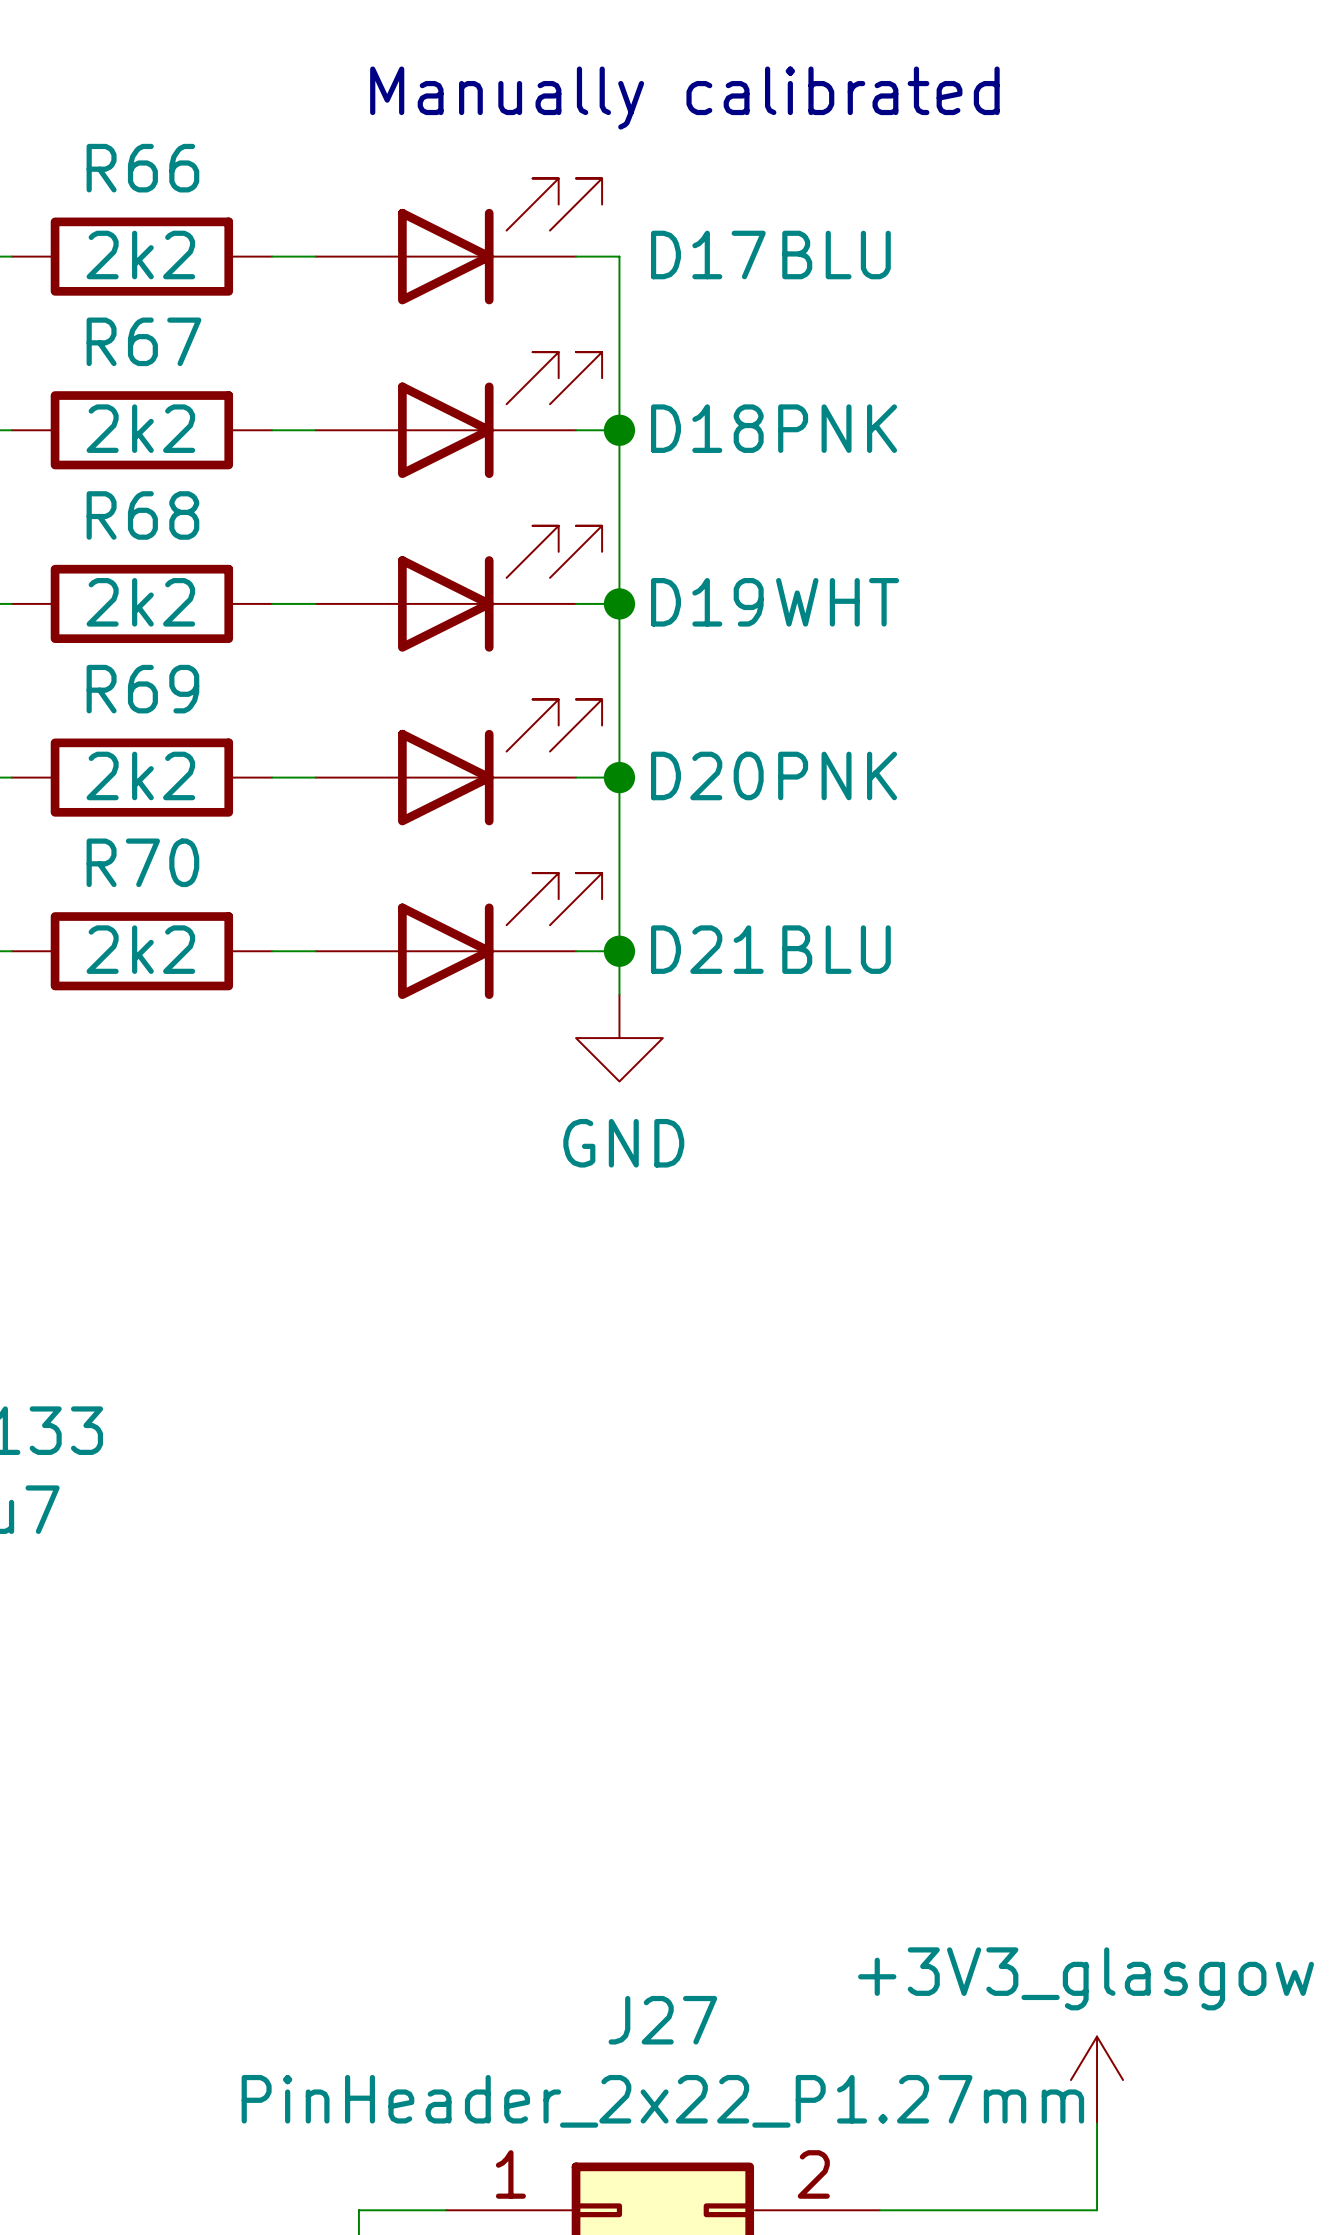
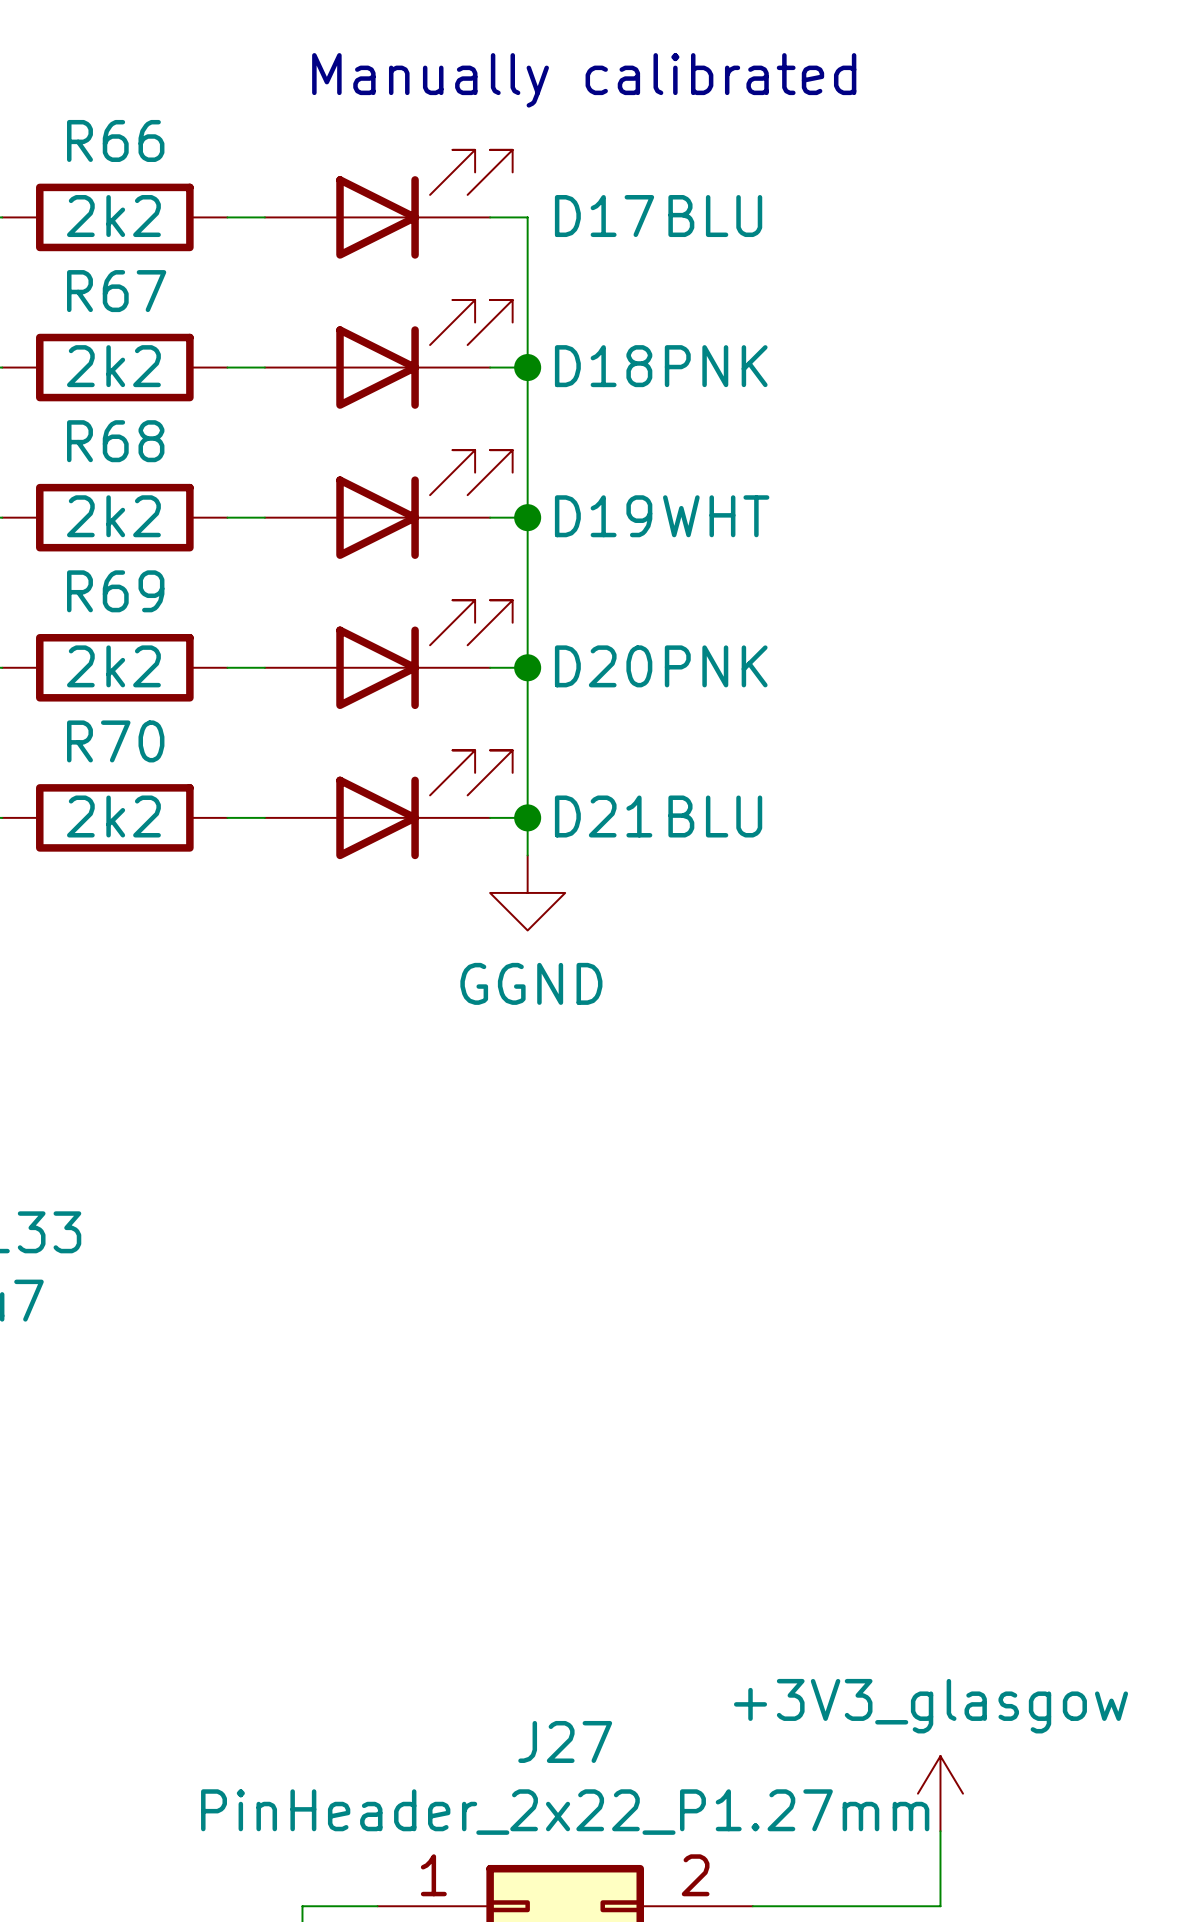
power symbol: GND (619, 1038) -> GGND (527, 892)

